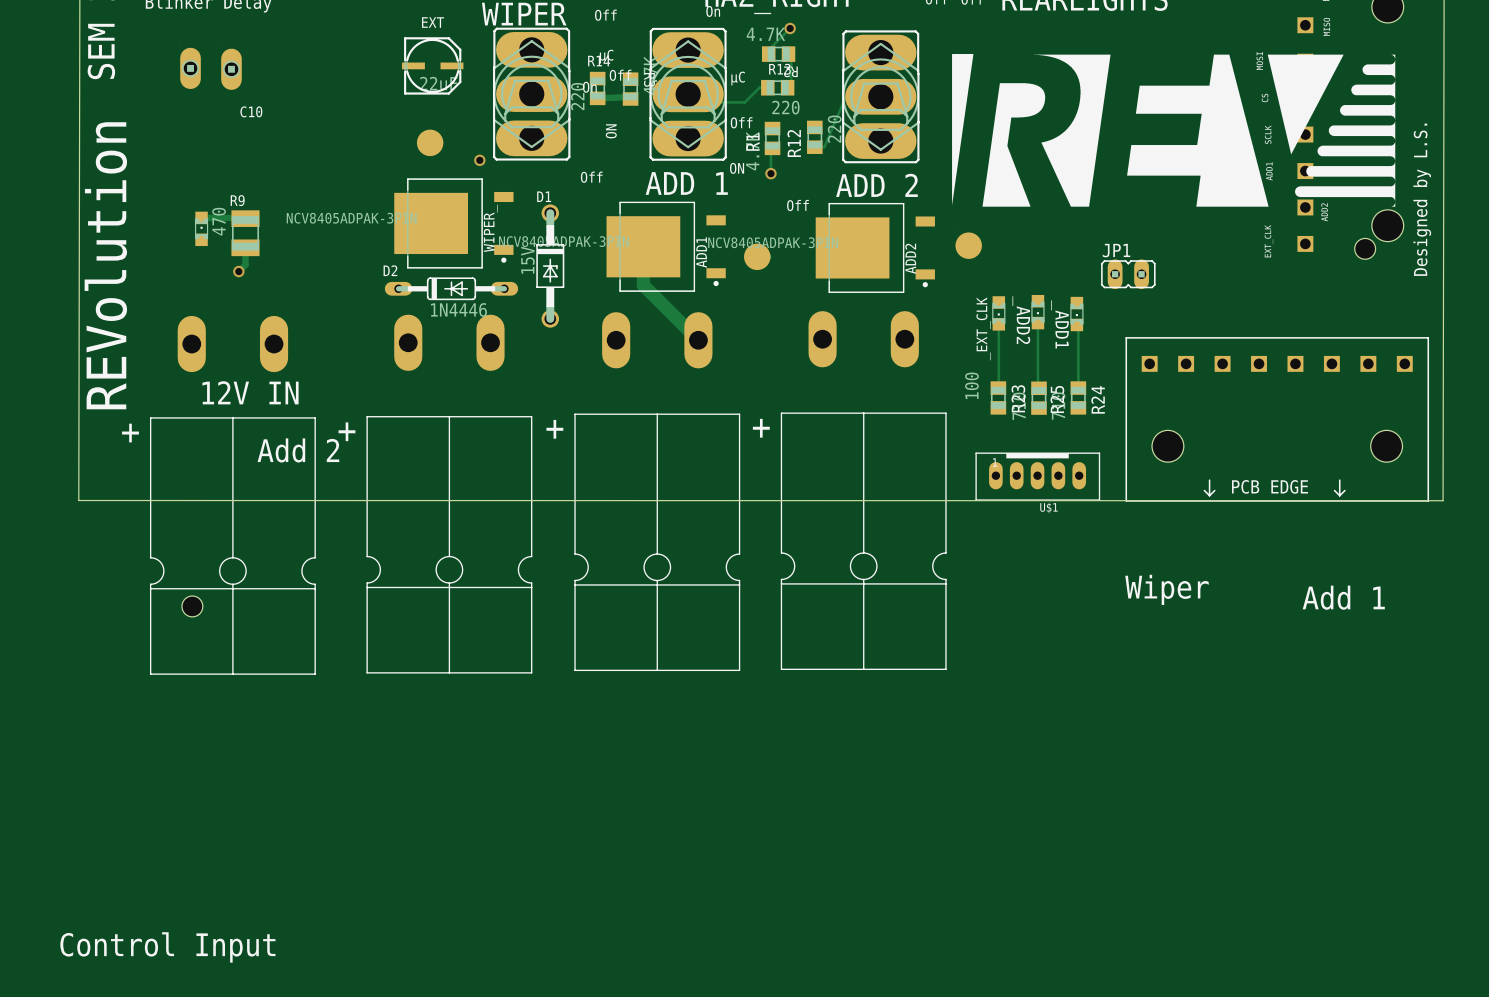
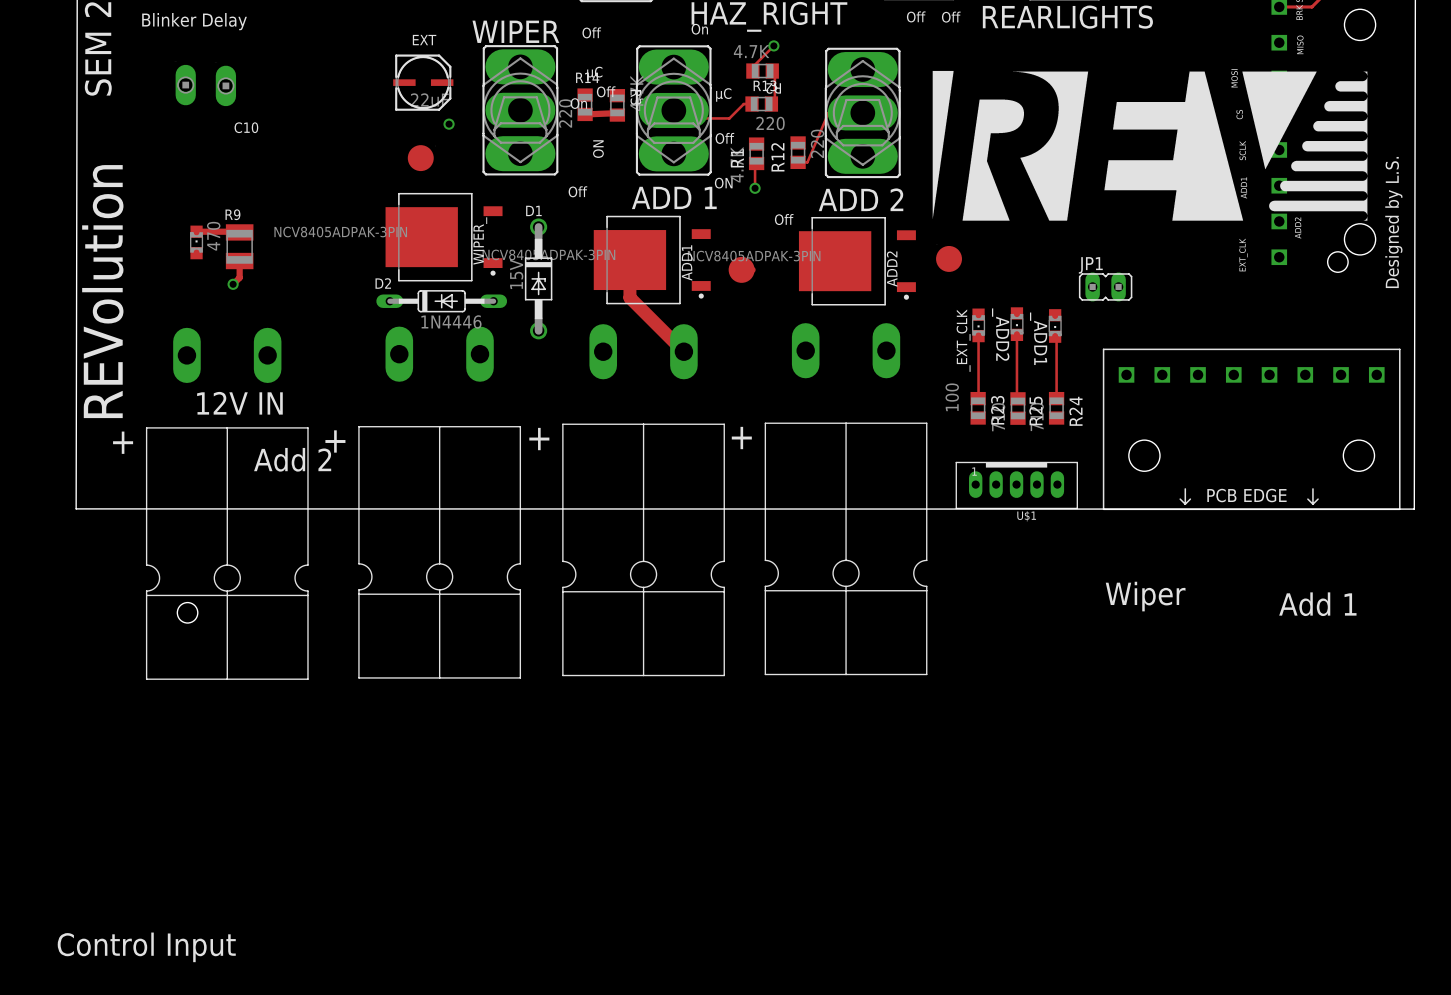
via position: (479, 160) -> (449, 124)

